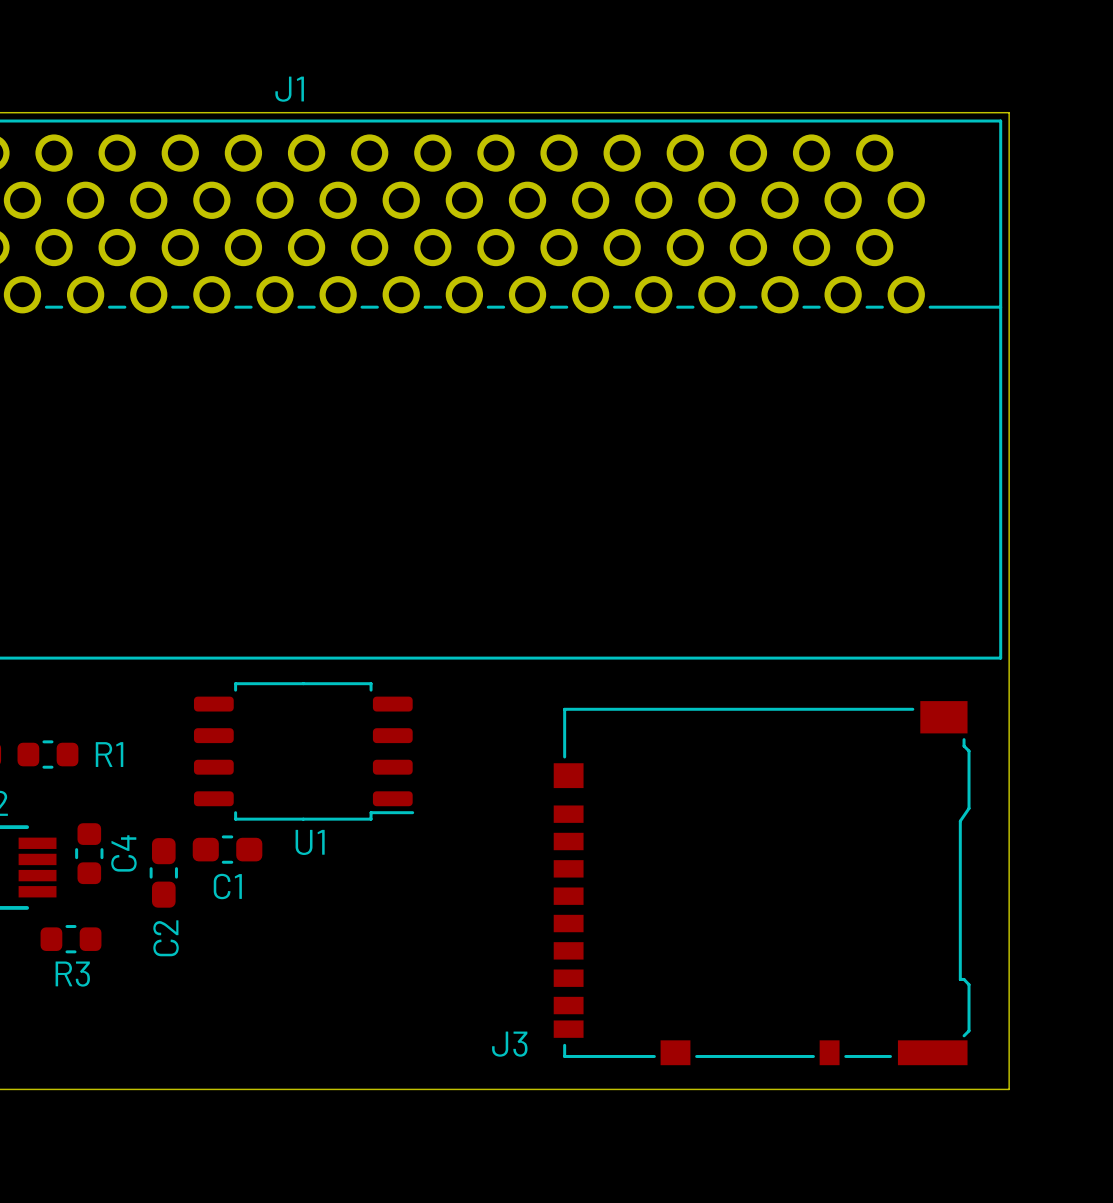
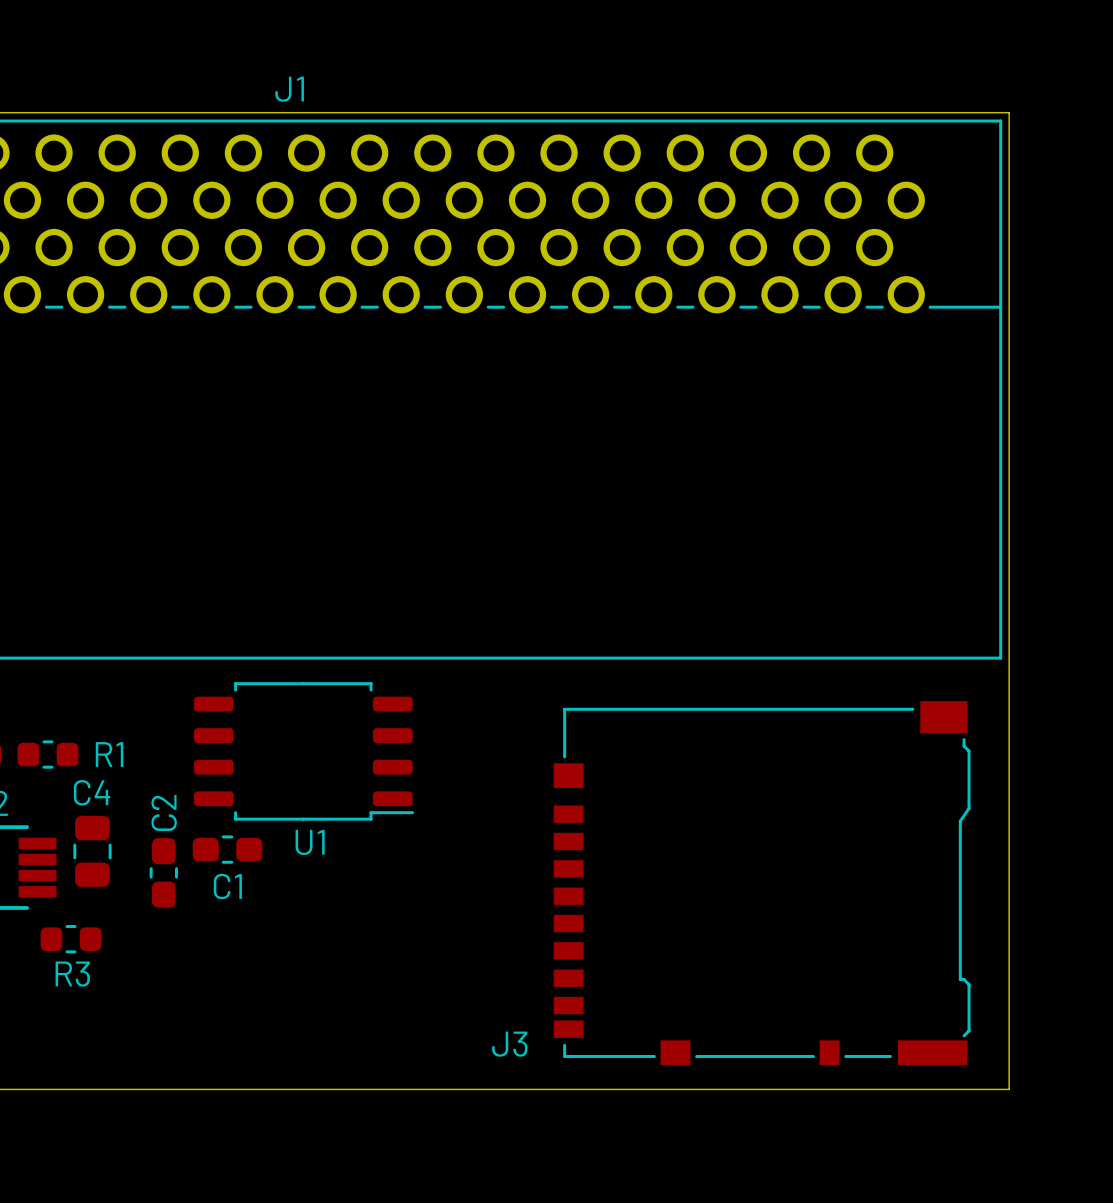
C4 footprint: [75, 823, 104, 885] -> [73, 816, 112, 887]
C4 name rotation: 0° (123, 853) -> 90° clockwise (92, 792)
C4 name position: C4 (123, 853) -> C4 (92, 792)
C2 name position: C2 (166, 938) -> C2 (164, 812)

